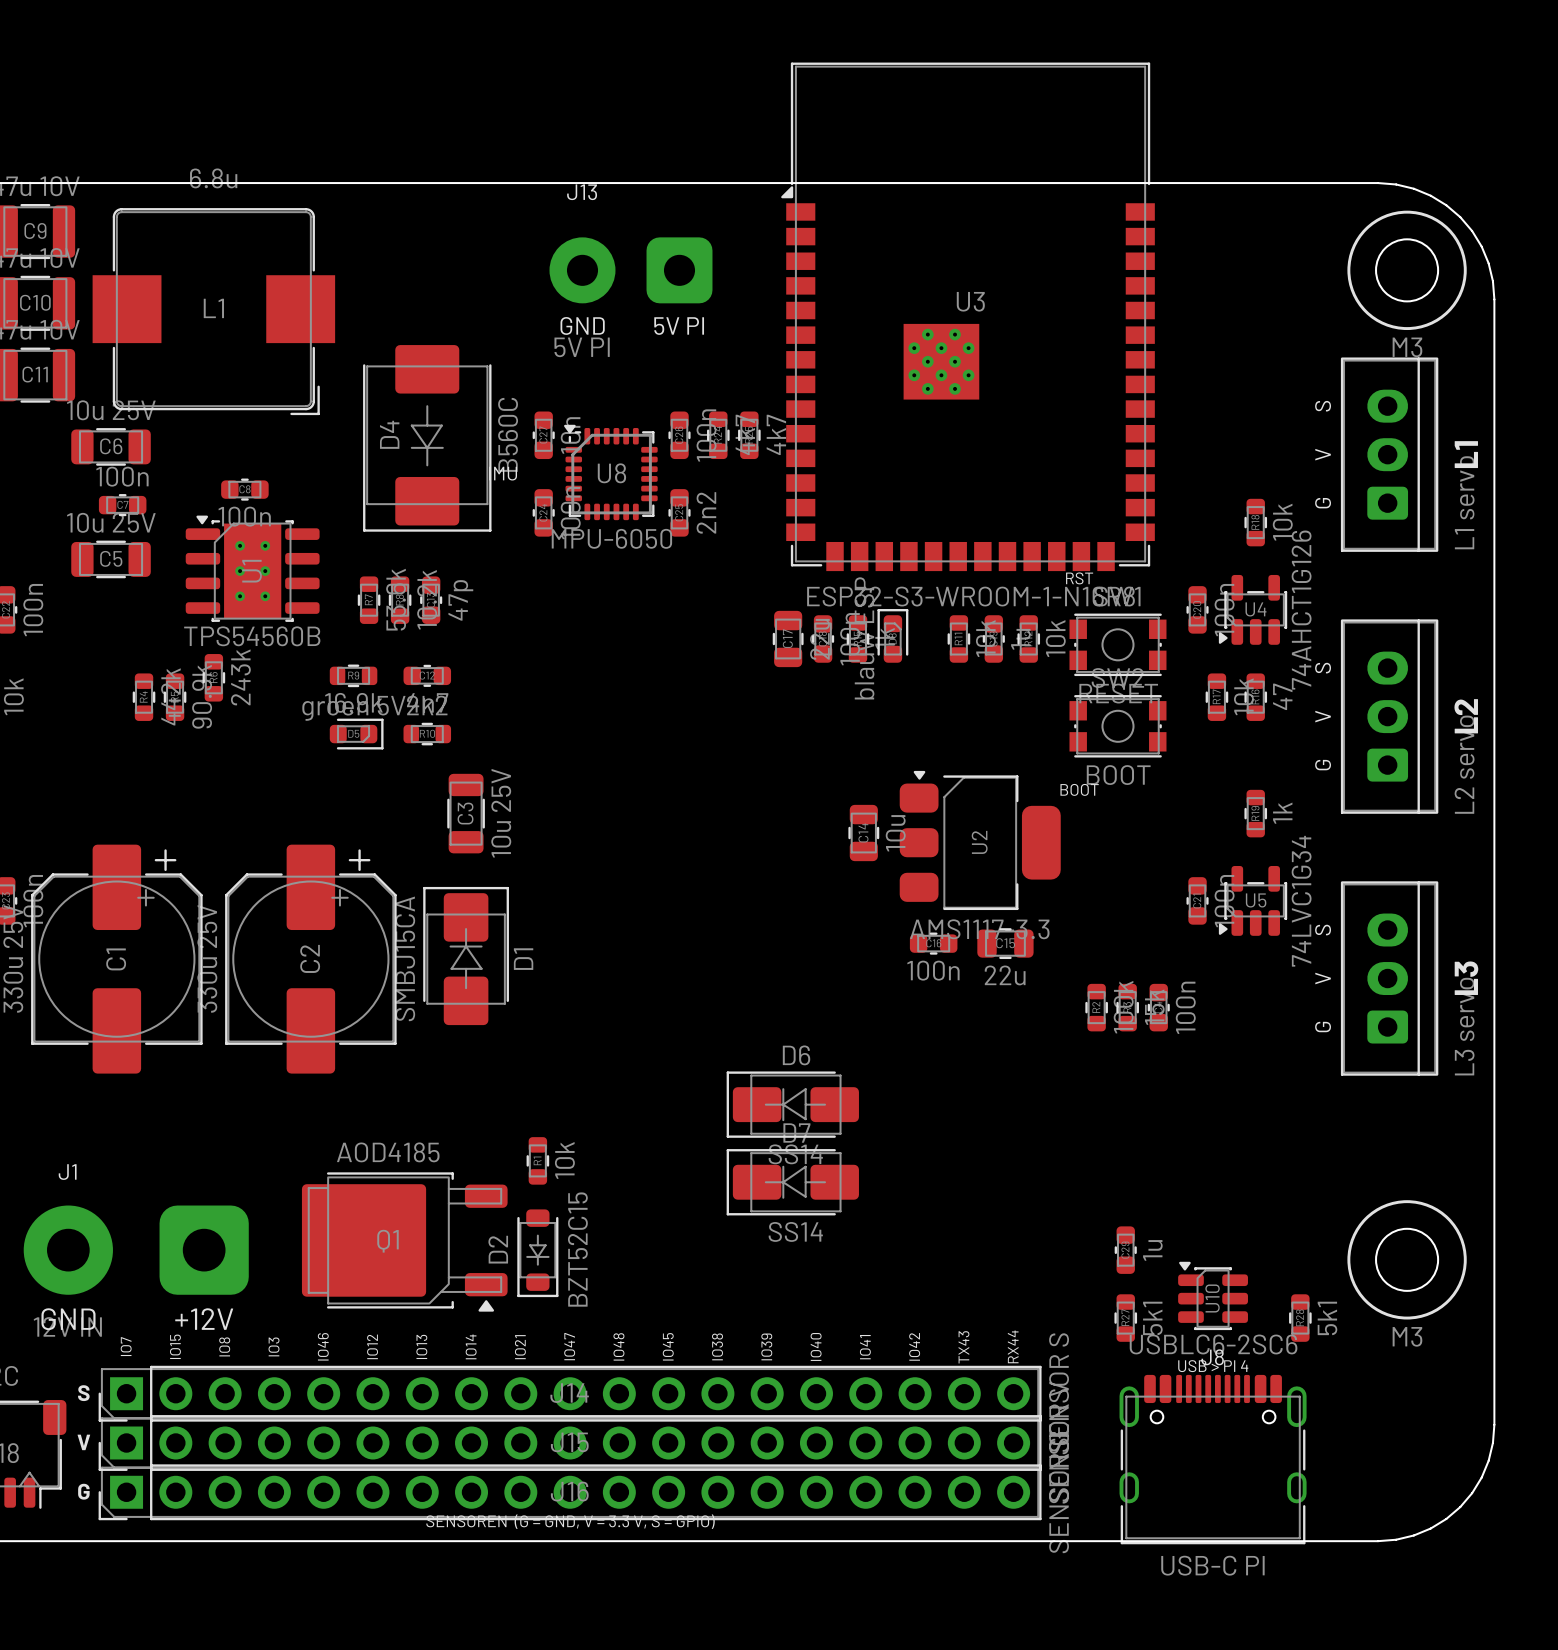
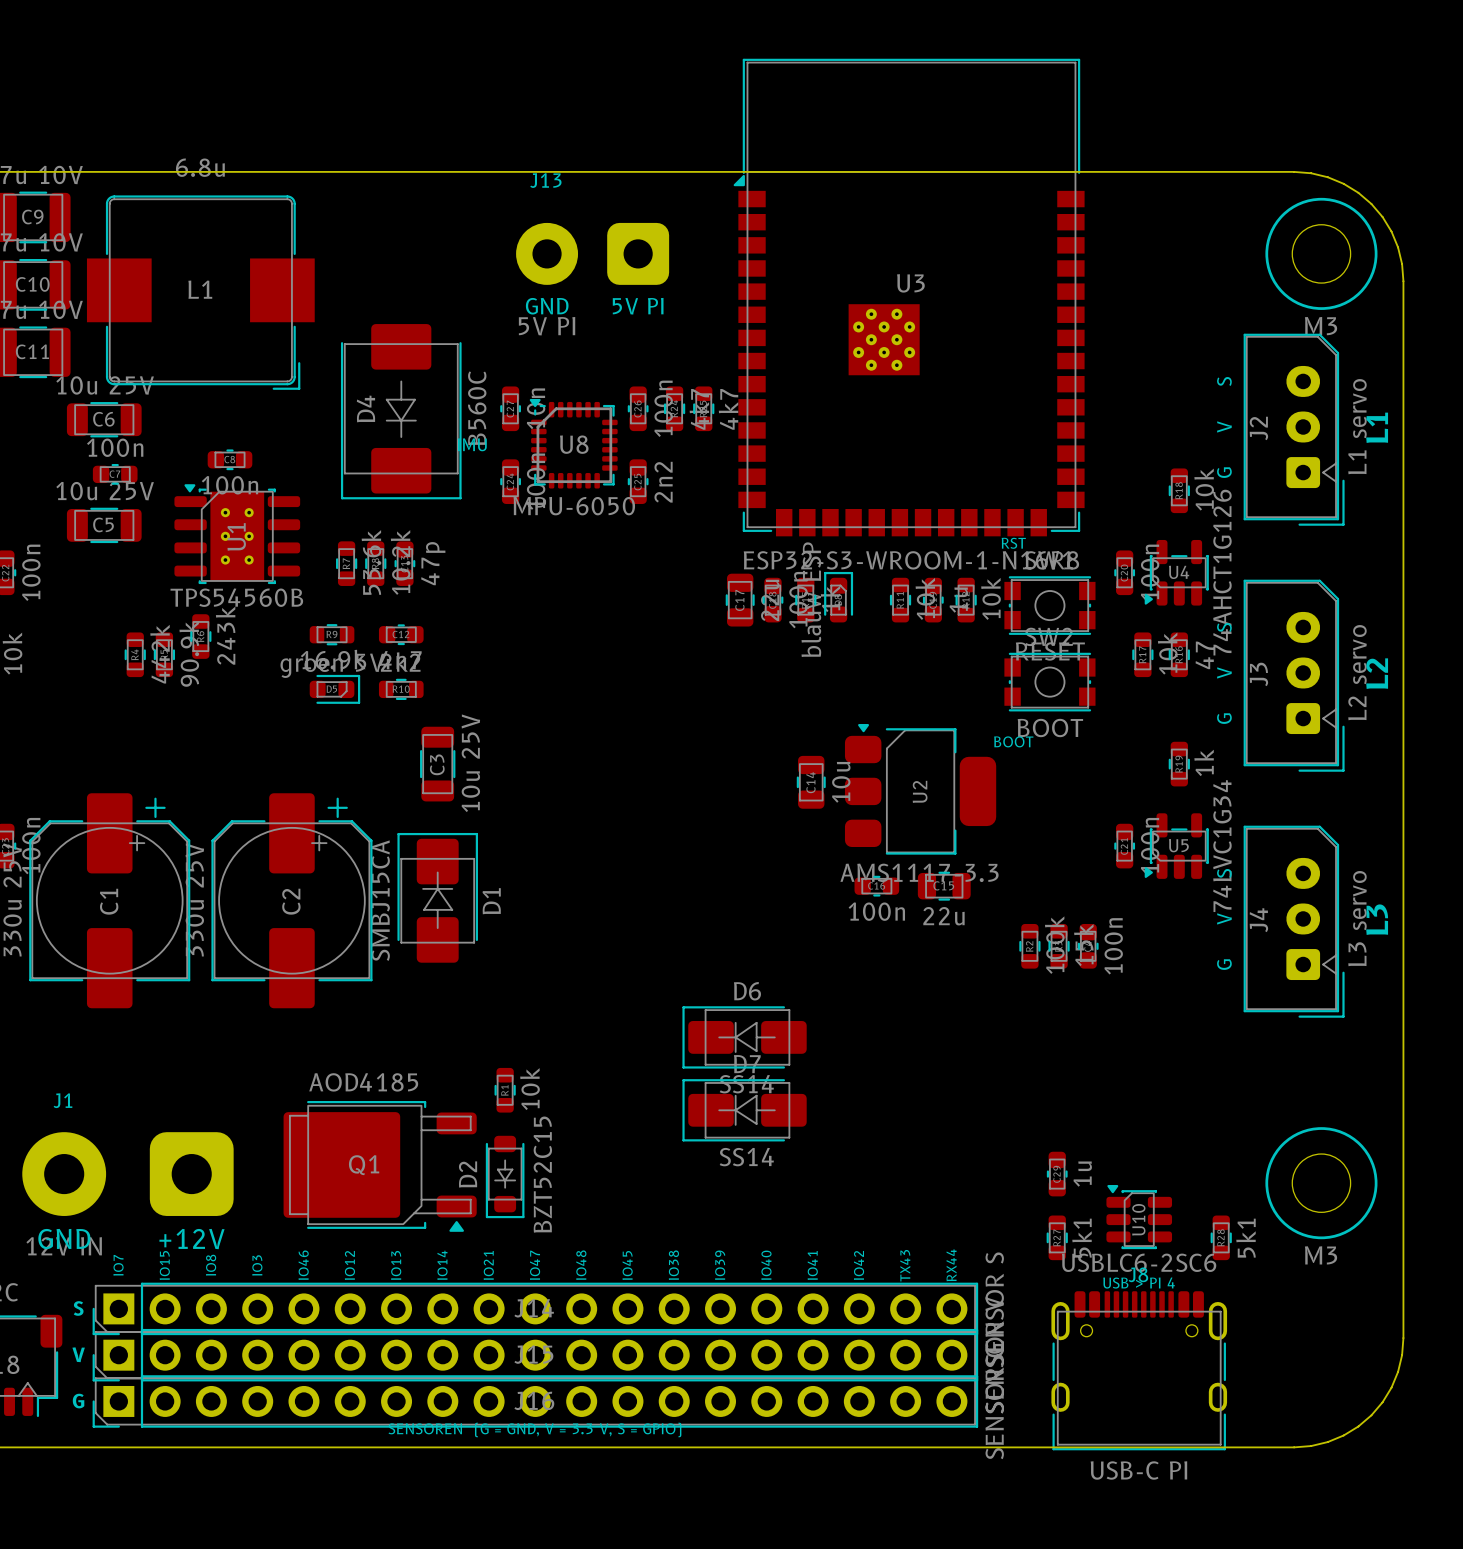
part: L1 servo (1389, 454) -> none
J2: none -> L1 servo (1294, 429)
part: L2 servo (1389, 716) -> none
J3: none -> L2 servo (1294, 675)
part: L3 servo (1389, 978) -> none
J4: none -> L3 servo (1294, 921)

